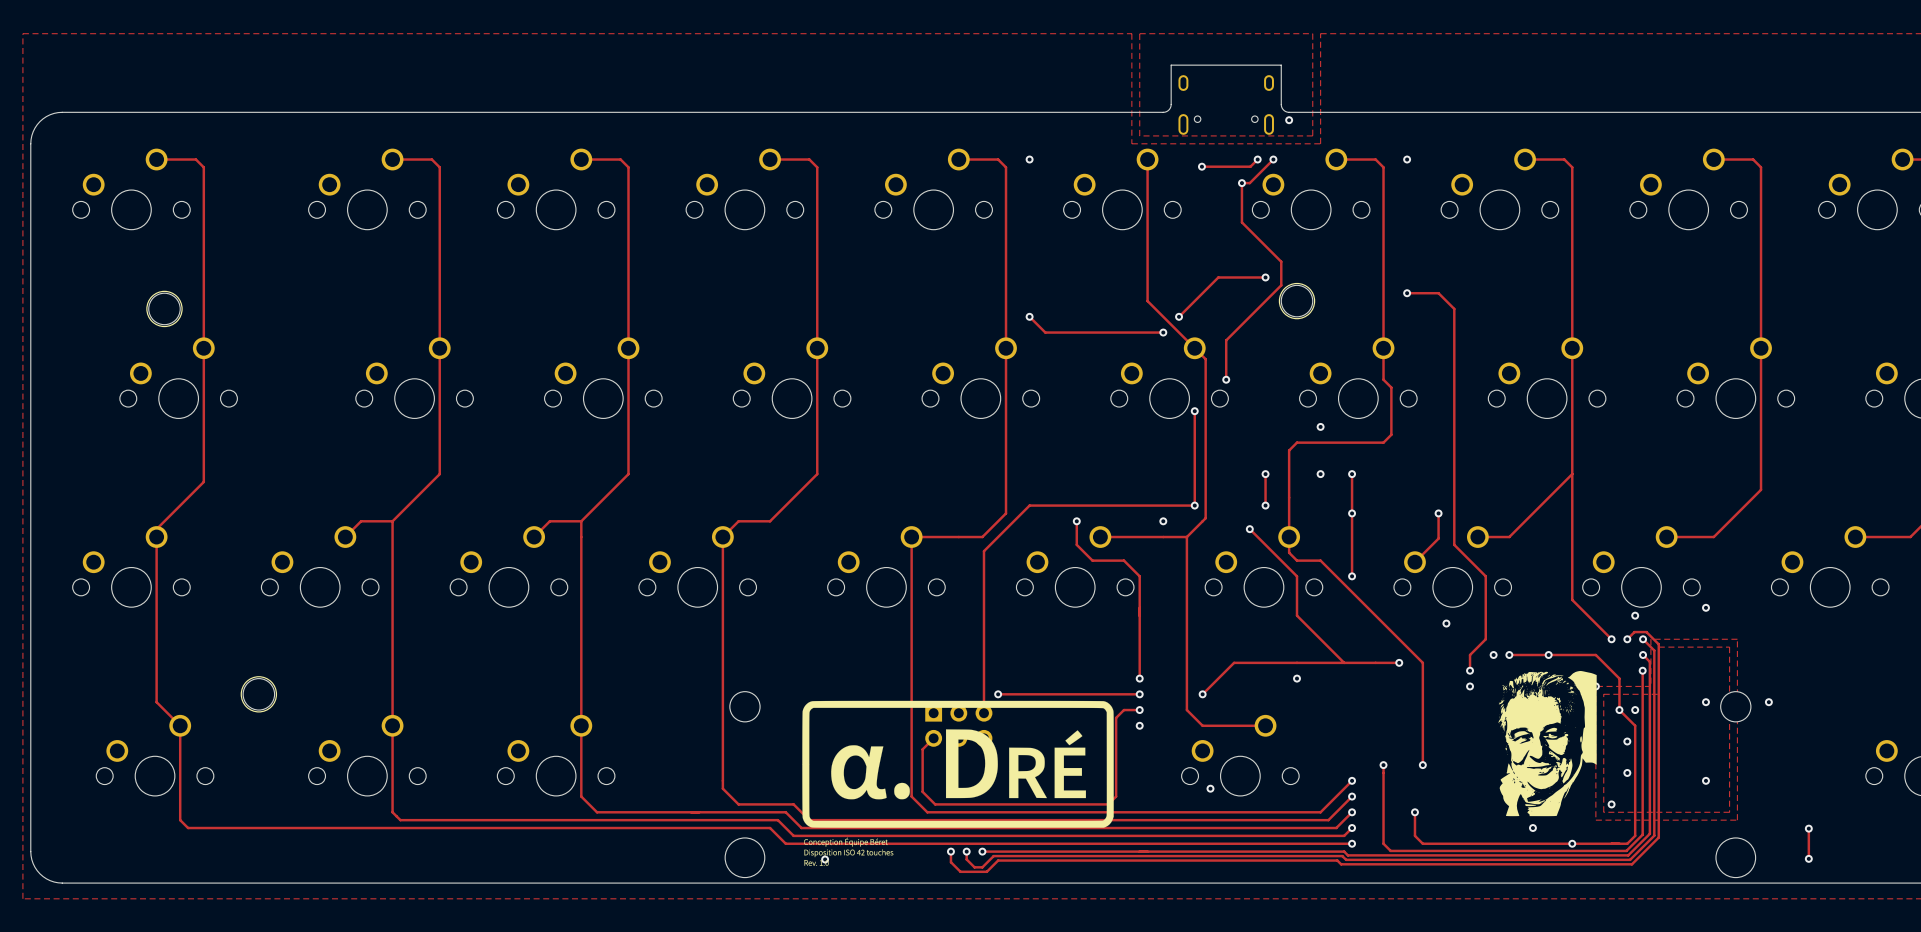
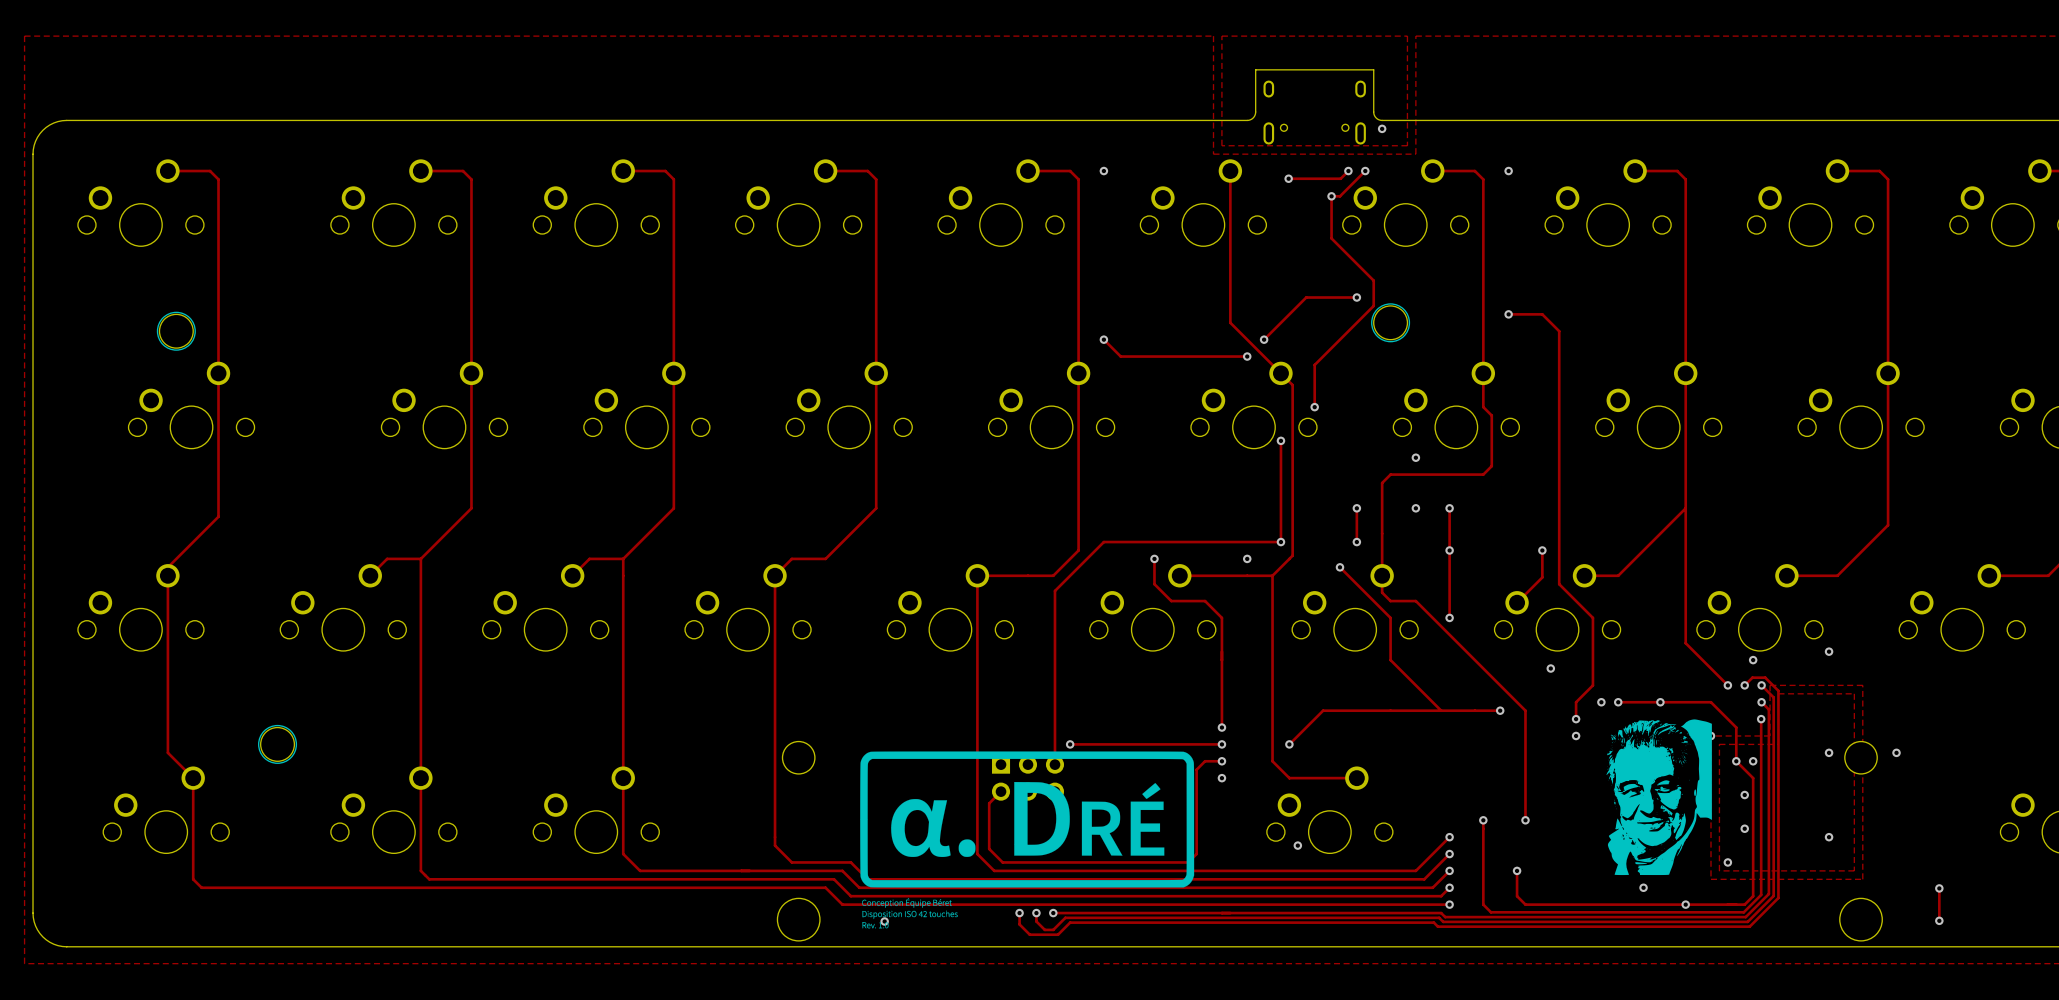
via: (1297, 678) -> none

